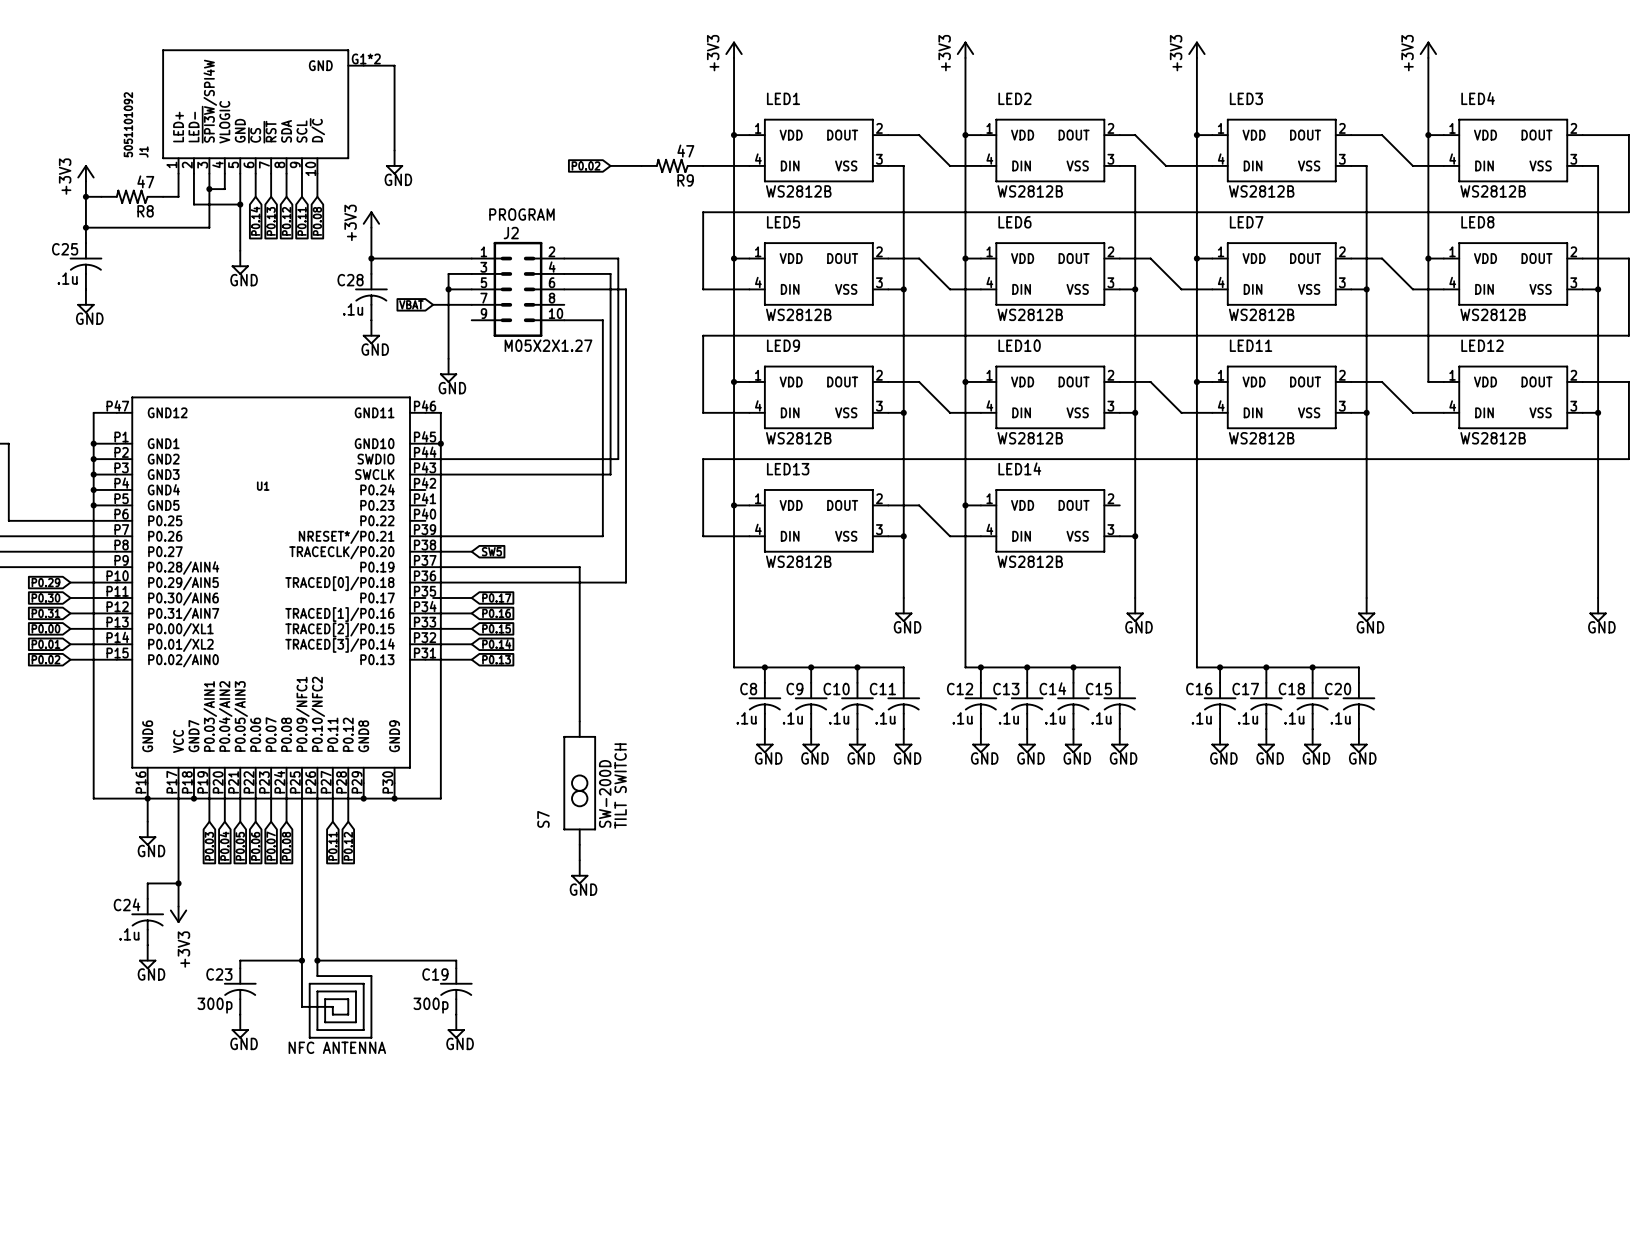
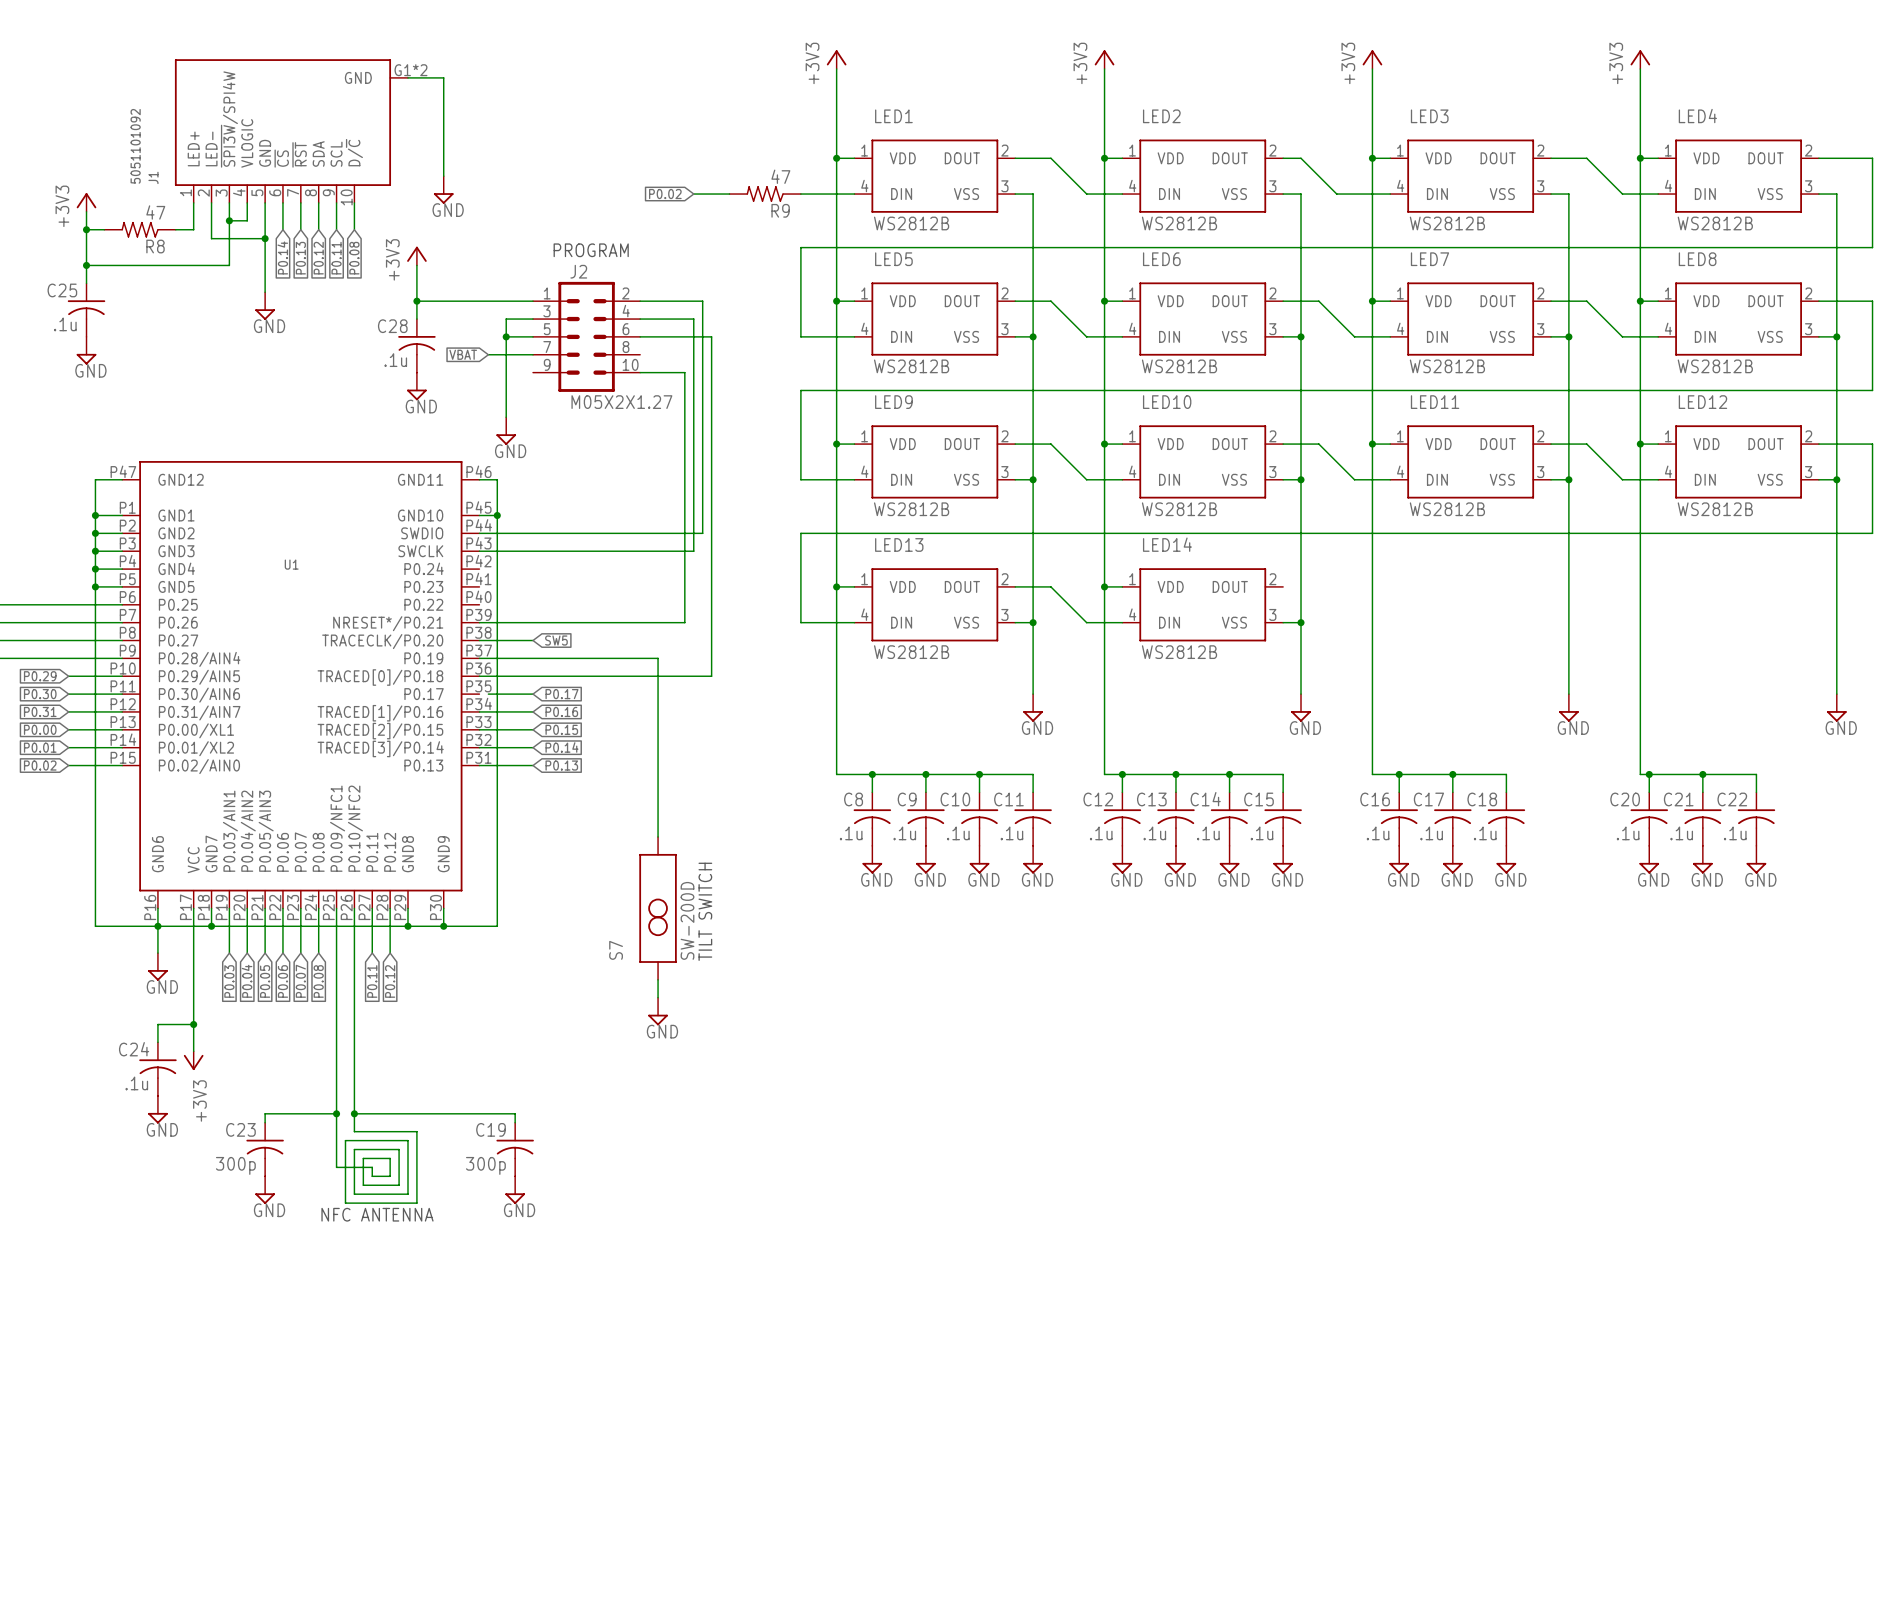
wire: none -> (1640, 444) (1640, 774) (1756, 774) (1756, 792)
junction: none -> (1640, 444)
wire: (1312, 667) (1358, 667) (1358, 682) -> none
junction: (1312, 667) -> none
wire: none -> (1649, 774) (1649, 792)
junction: none -> (1649, 774)
wire: none -> (1702, 774) (1702, 792)
junction: none -> (1702, 774)
C20 position: (1358, 706) -> (1649, 819)
C21: none -> .1u (1702, 819)
C22: none -> .1u (1756, 819)
power symbol: GND (1358, 741) -> none
power symbol: none -> GND (1649, 859)
power symbol: none -> GND (1702, 859)
power symbol: none -> GND (1756, 859)

